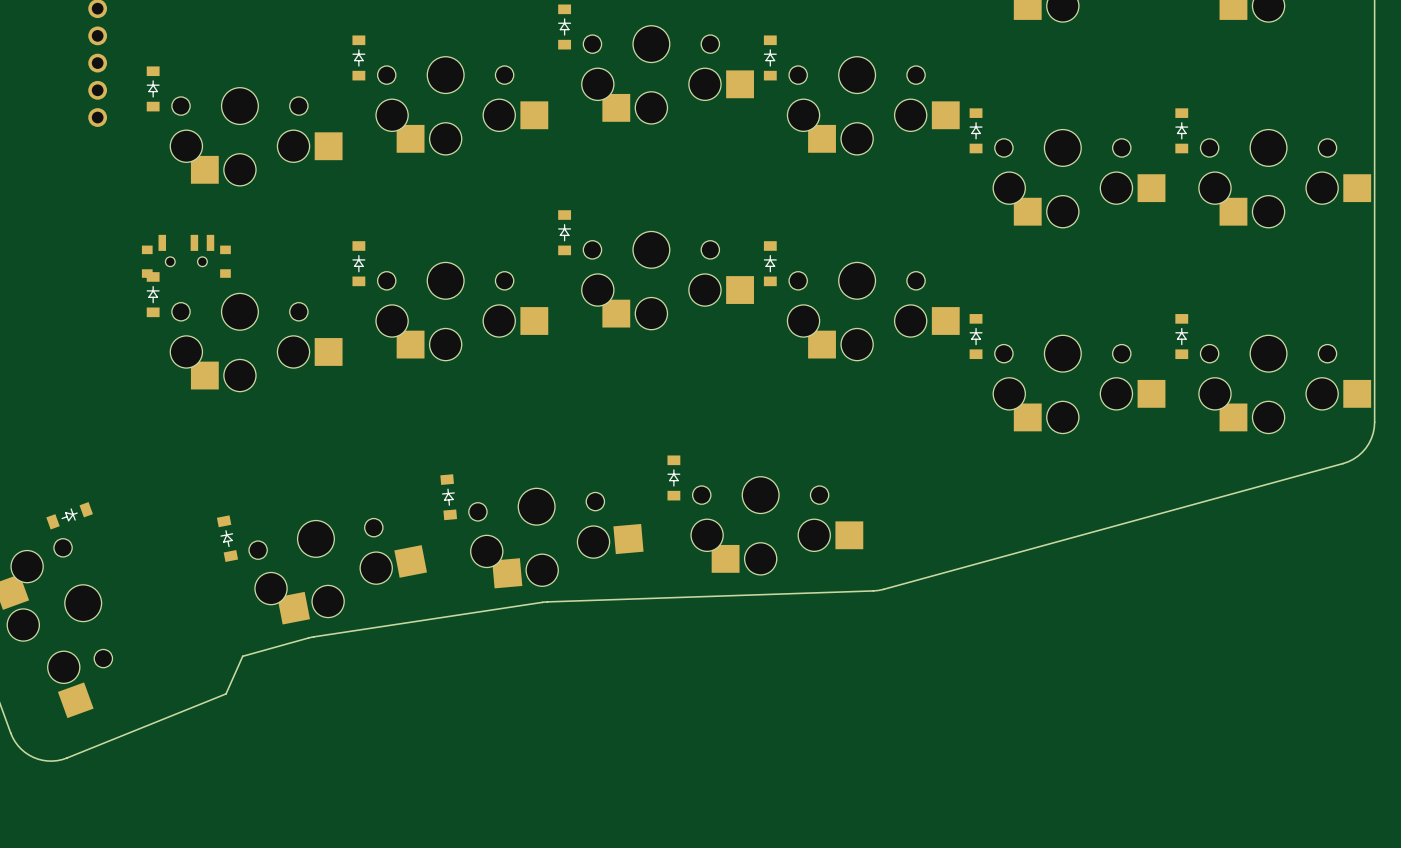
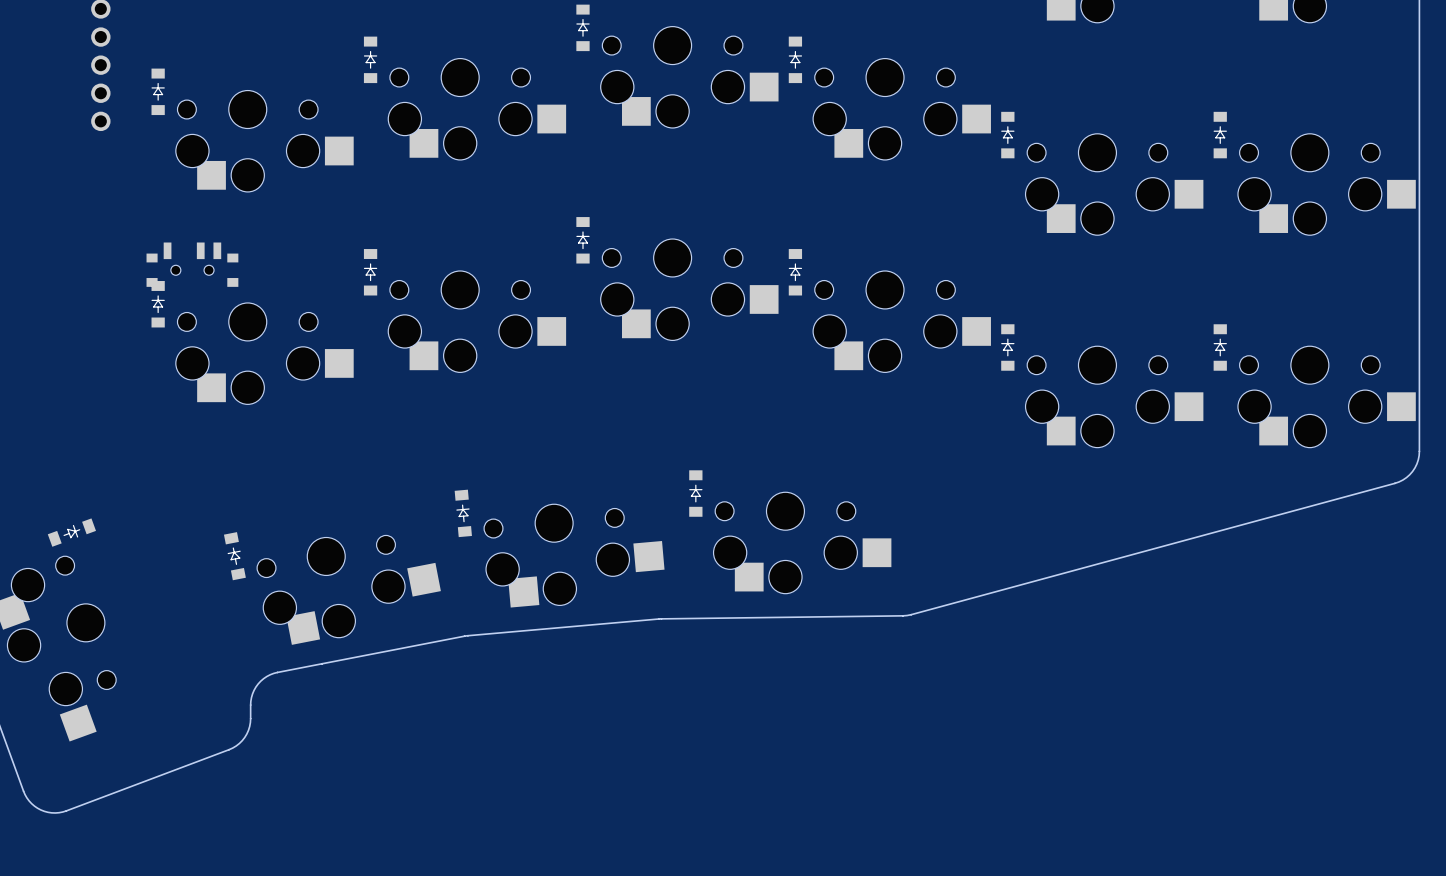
board edge: (1374, 422) (1373, 433) (1365, 448) (1353, 459) (1343, 463) (883, 589) (544, 602) (313, 636) (242, 656) (226, 693) (62, 759) (47, 761) (29, 755) (17, 745) (10, 732) -> (1419, 435) (1416, 464) (1409, 474) (1399, 481) (911, 614) (658, 619) (466, 635) (322, 663)
board edge: none -> (322, 663) (273, 673) (260, 681) (251, 697) (248, 730) (242, 740) (232, 748) (62, 812) (44, 811) (31, 803) (25, 794) (11, 756)

